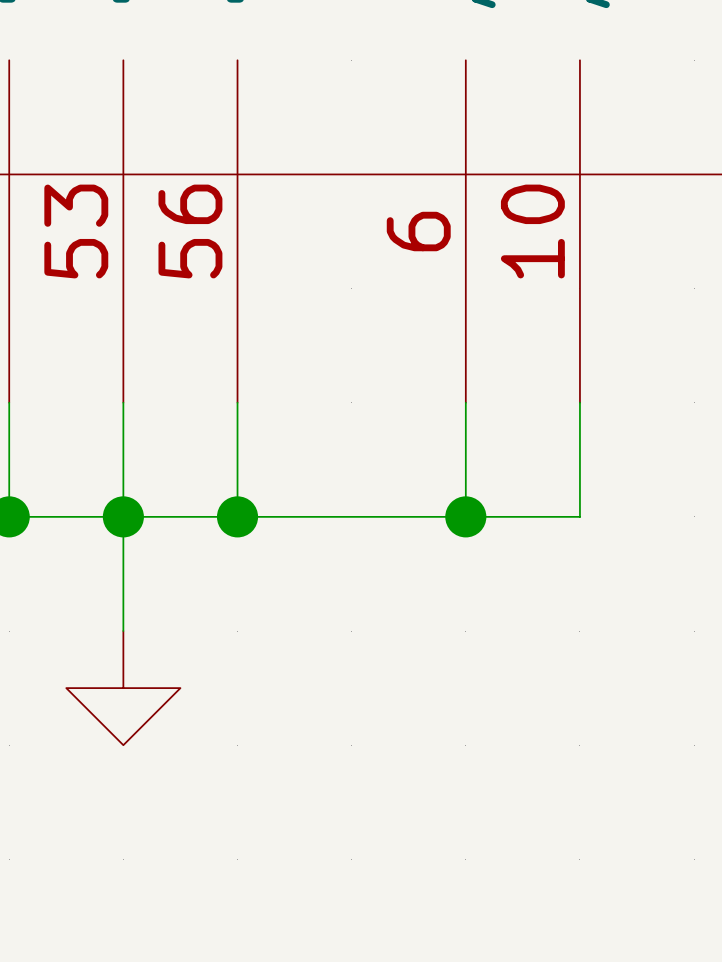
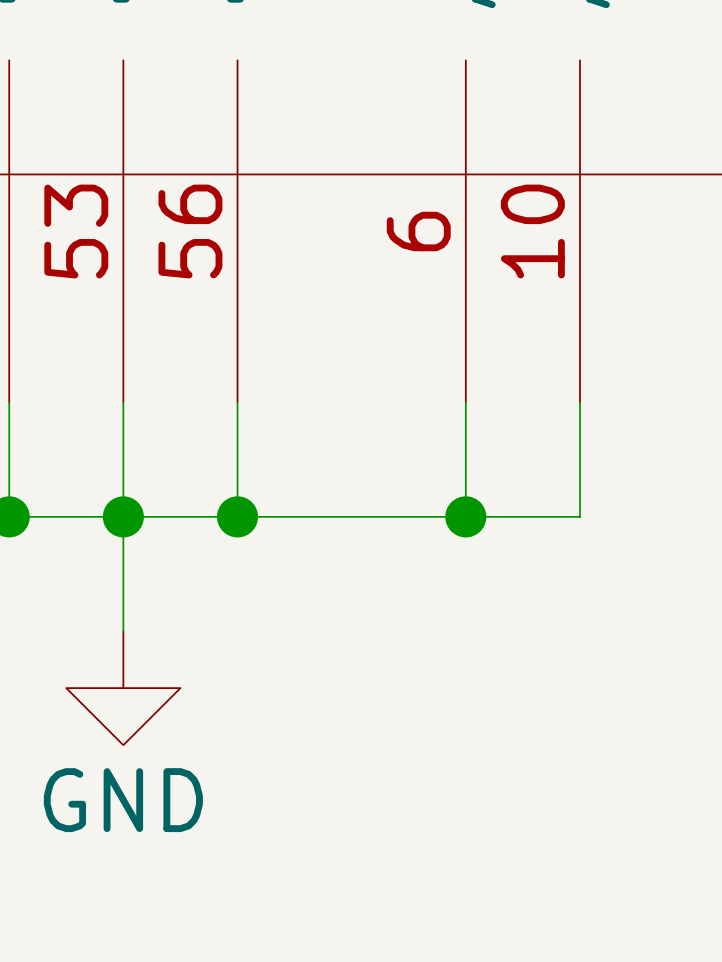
power symbol text: none -> GND (123, 800)

